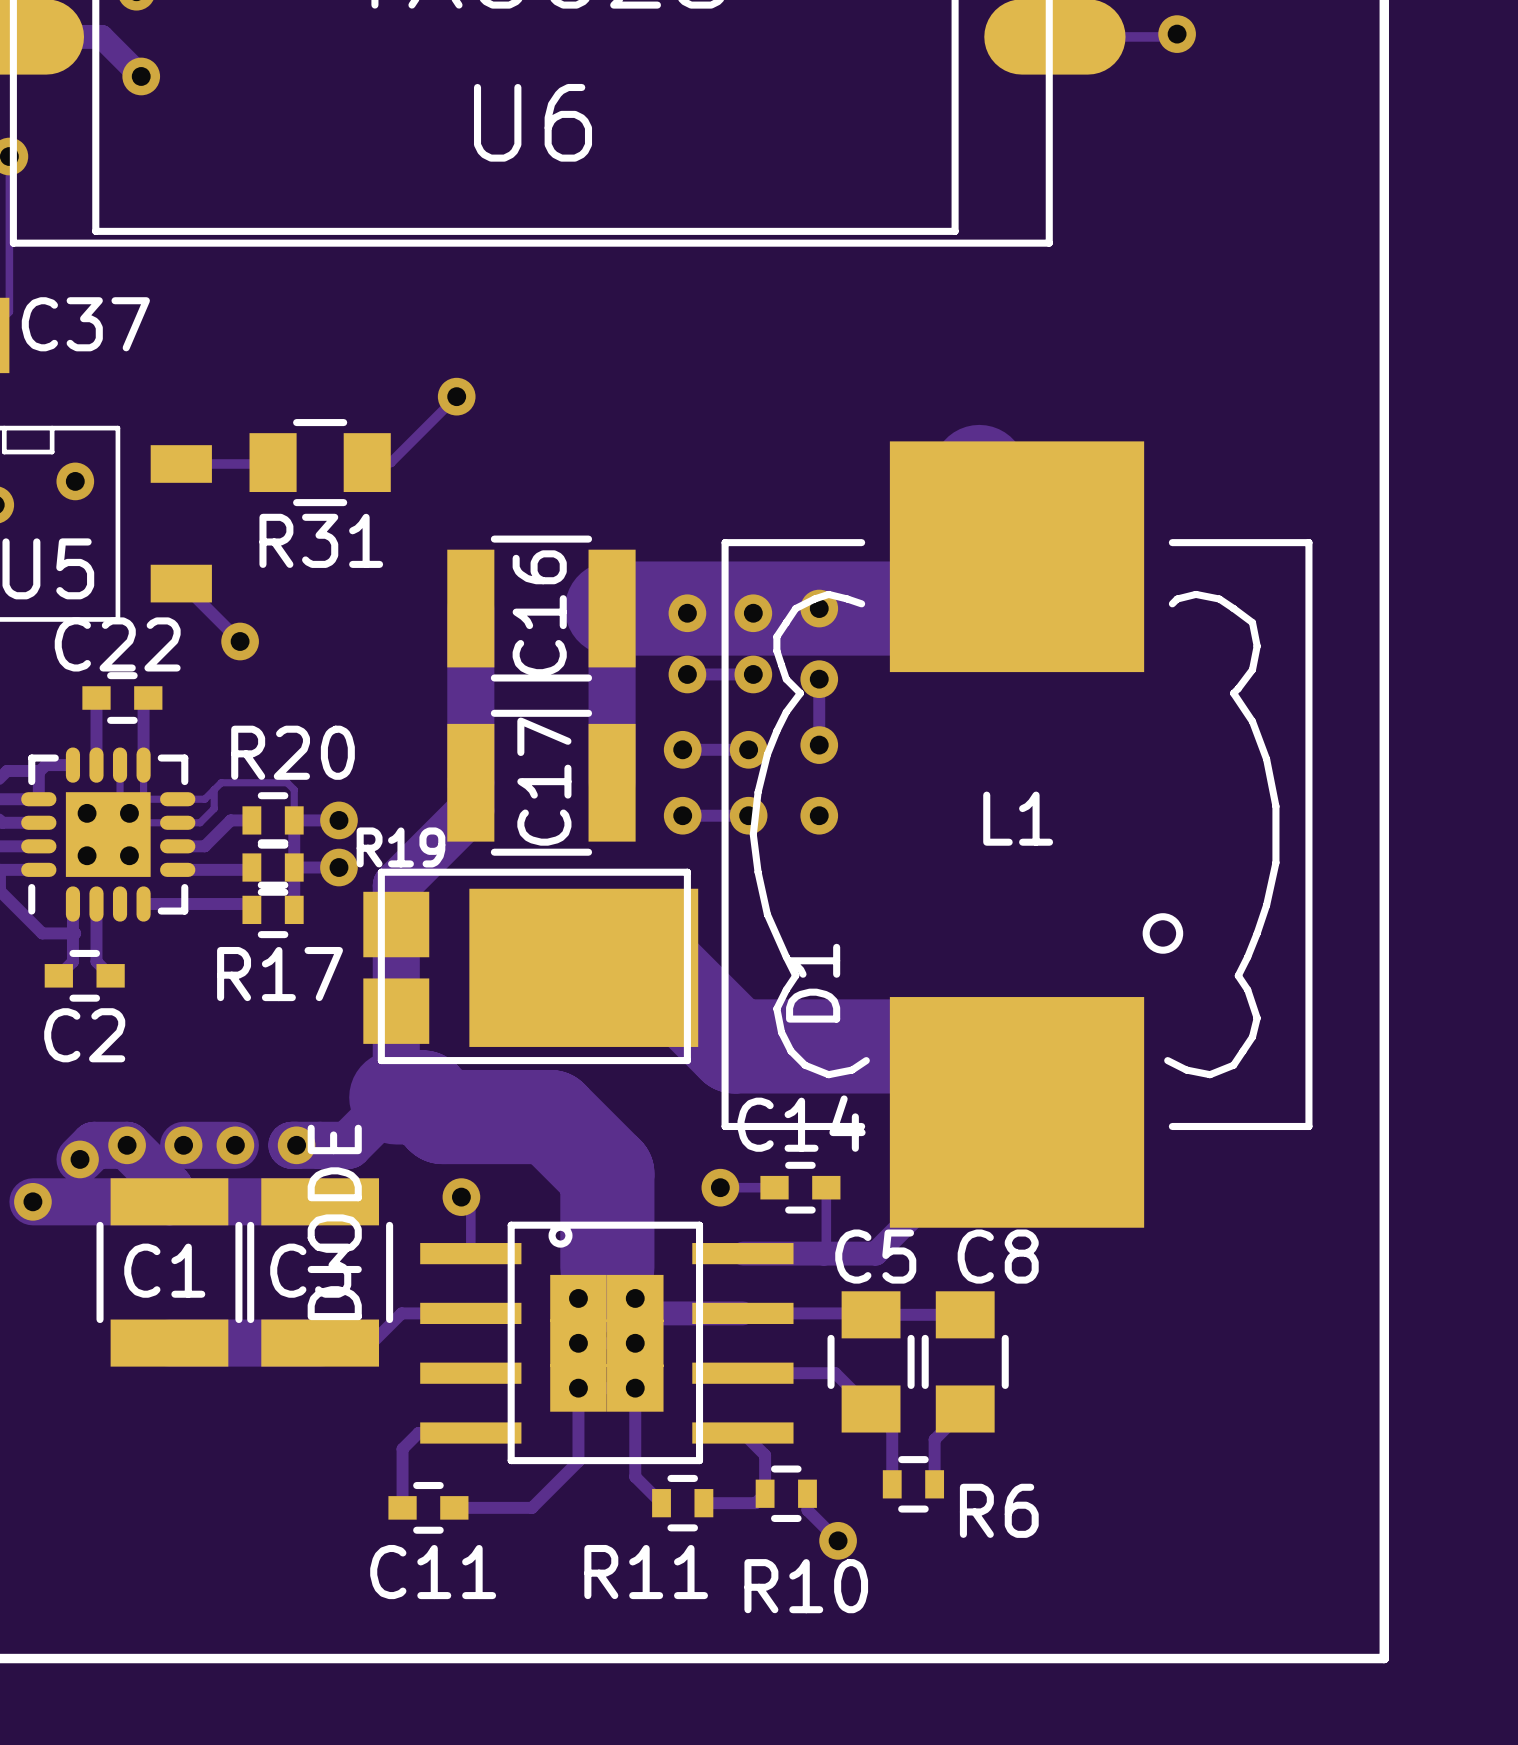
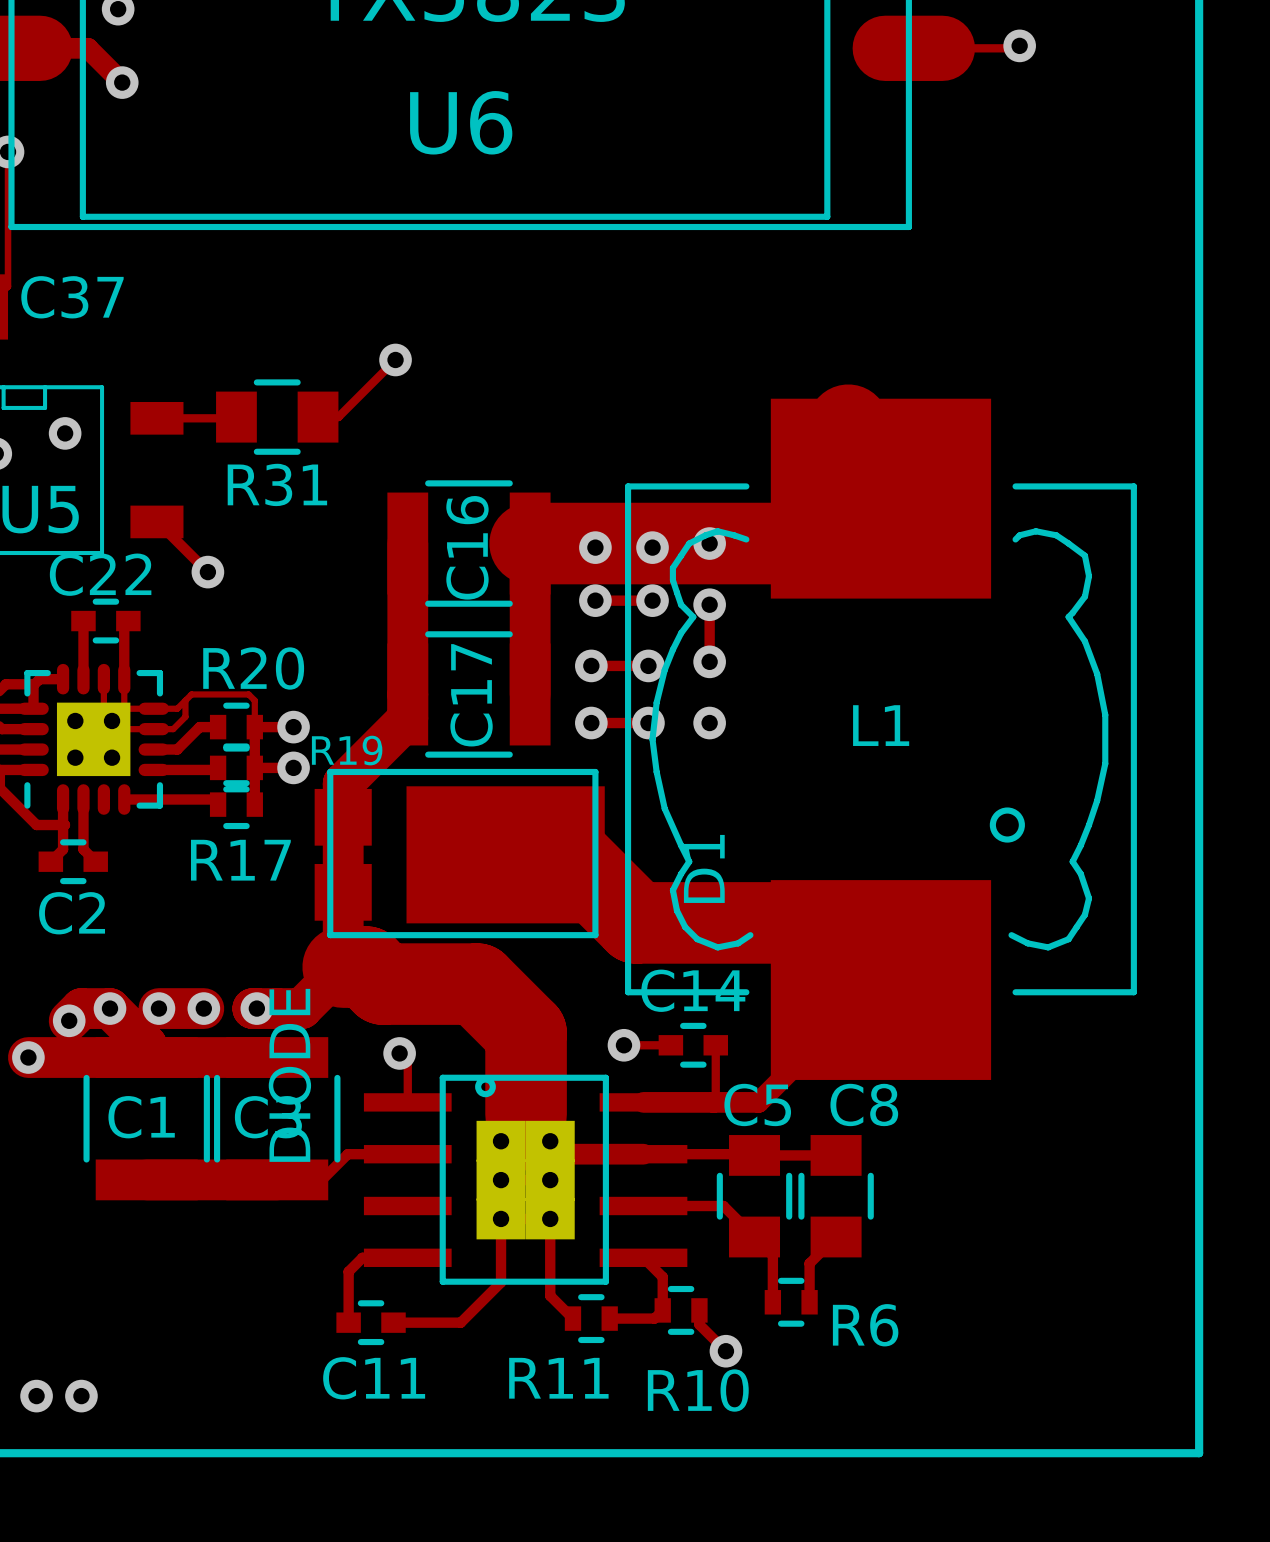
via: none -> (36, 1396)
via: none -> (81, 1396)

